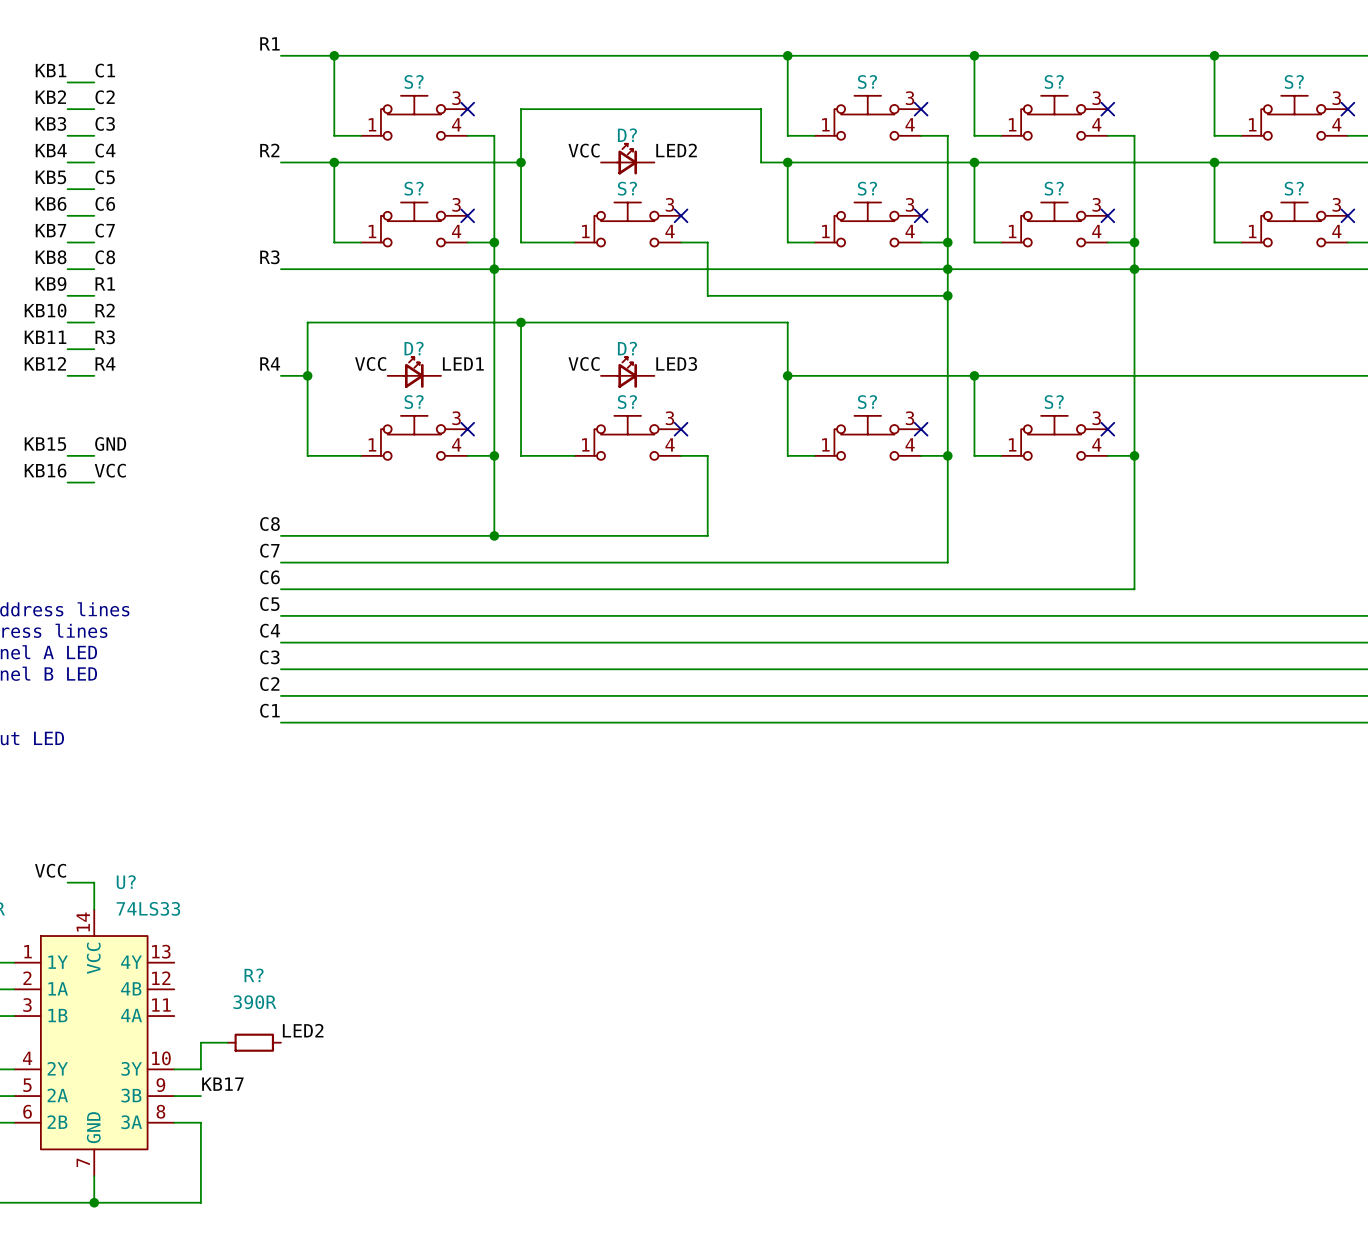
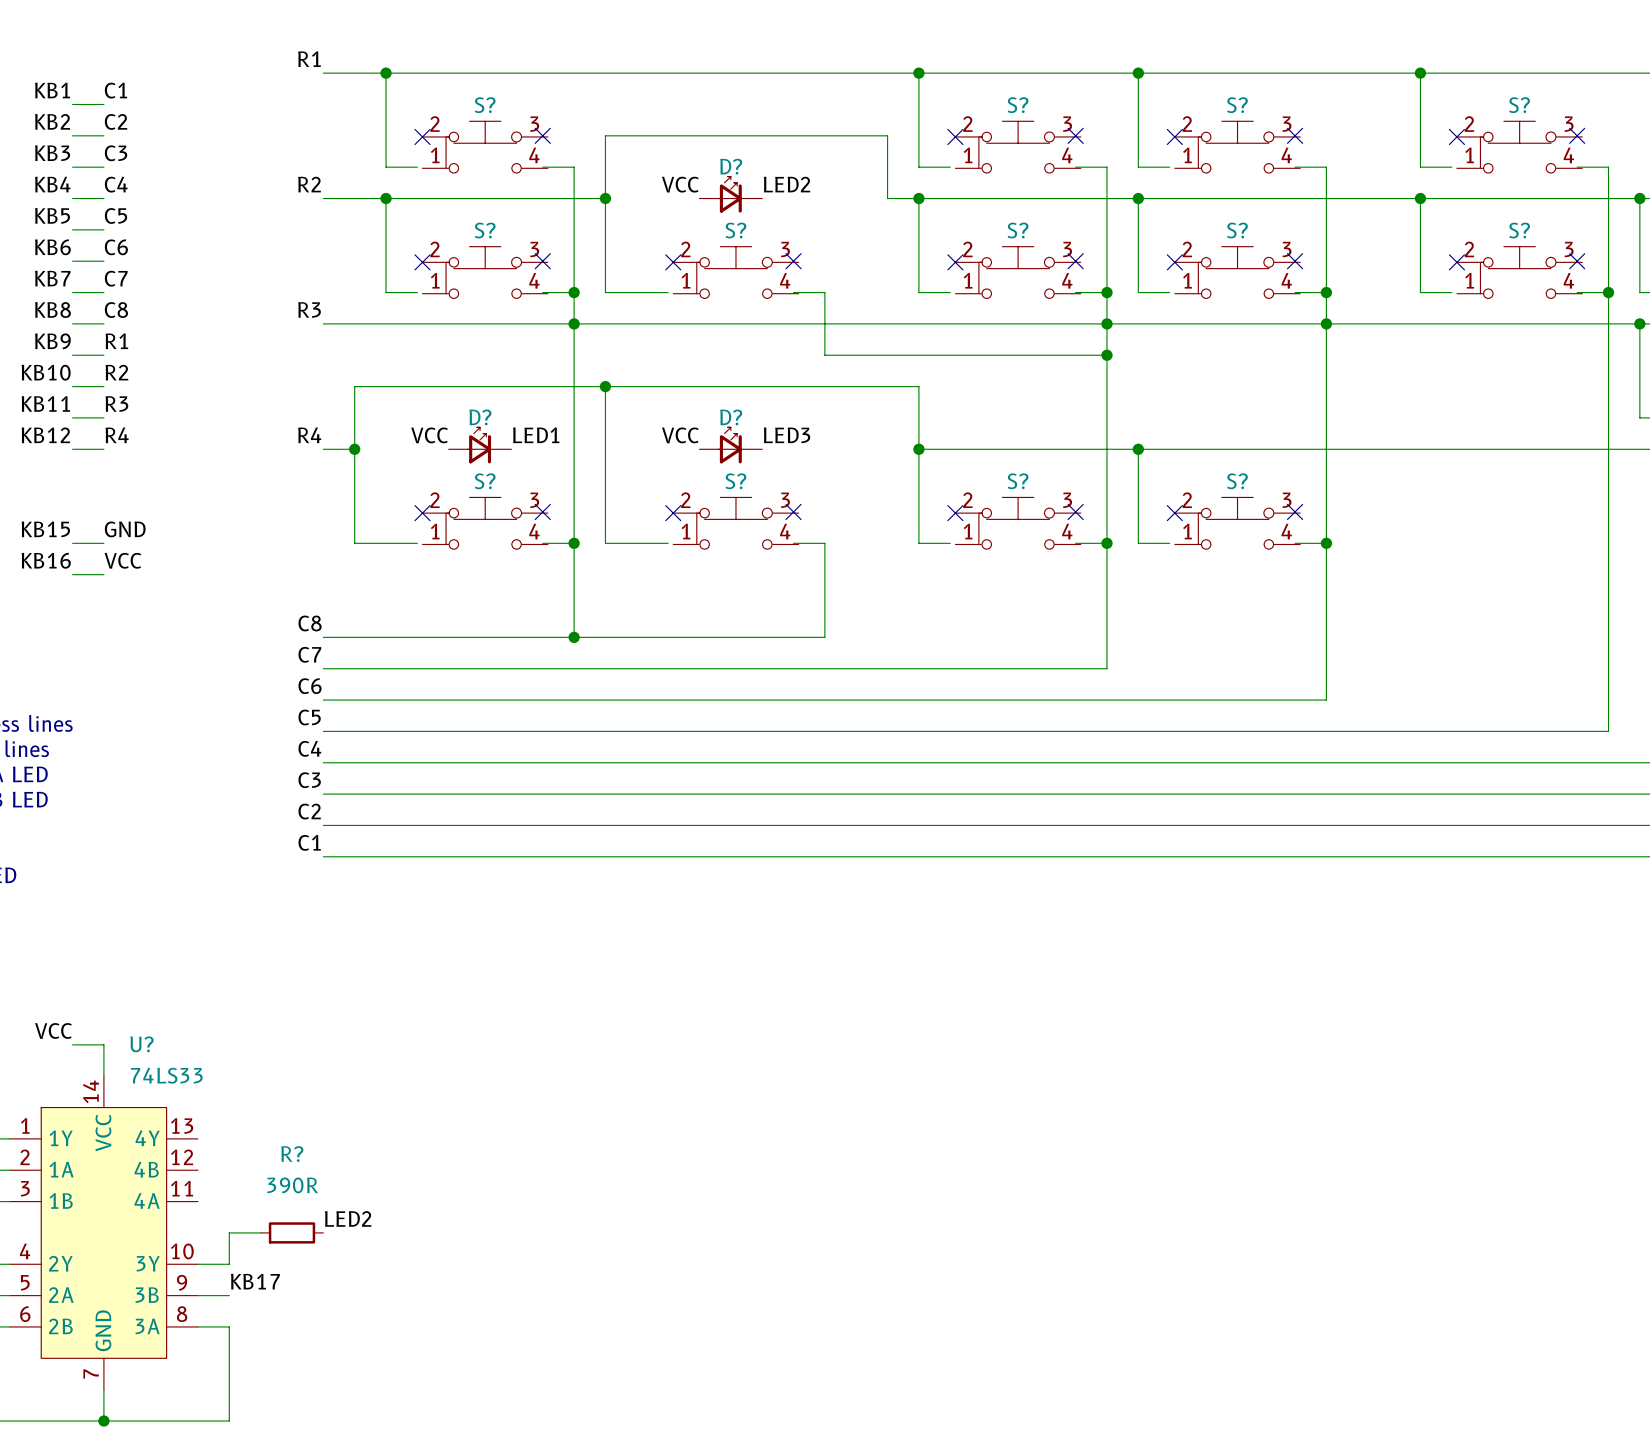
S? symbol: [360, 95, 468, 140] -> [422, 121, 548, 174]
S? symbol: [814, 95, 922, 140] -> [955, 121, 1081, 174]
S? symbol: [1001, 95, 1108, 140] -> [1174, 121, 1301, 174]
S? symbol: [1241, 95, 1348, 140] -> [1456, 121, 1583, 174]
no-connect mark: none -> (422, 136)
no-connect mark: none -> (955, 136)
no-connect mark: none -> (1174, 136)
no-connect mark: none -> (1456, 136)
S? symbol: [360, 202, 468, 247] -> [422, 246, 548, 299]
S? symbol: [574, 202, 682, 247] -> [673, 246, 799, 299]
S? symbol: [814, 202, 922, 247] -> [955, 246, 1081, 299]
S? symbol: [1001, 202, 1108, 247] -> [1174, 246, 1301, 299]
S? symbol: [1241, 202, 1348, 247] -> [1456, 246, 1583, 299]
no-connect mark: none -> (422, 262)
no-connect mark: none -> (673, 262)
no-connect mark: none -> (955, 262)
no-connect mark: none -> (1174, 262)
no-connect mark: none -> (1456, 262)
S? symbol: [360, 415, 468, 460] -> [422, 497, 548, 550]
S? symbol: [574, 415, 682, 460] -> [673, 497, 799, 550]
S? symbol: [814, 415, 922, 460] -> [955, 497, 1081, 550]
S? symbol: [1001, 415, 1108, 460] -> [1174, 497, 1301, 550]
no-connect mark: none -> (422, 513)
no-connect mark: none -> (673, 513)
no-connect mark: none -> (955, 513)
no-connect mark: none -> (1174, 513)

